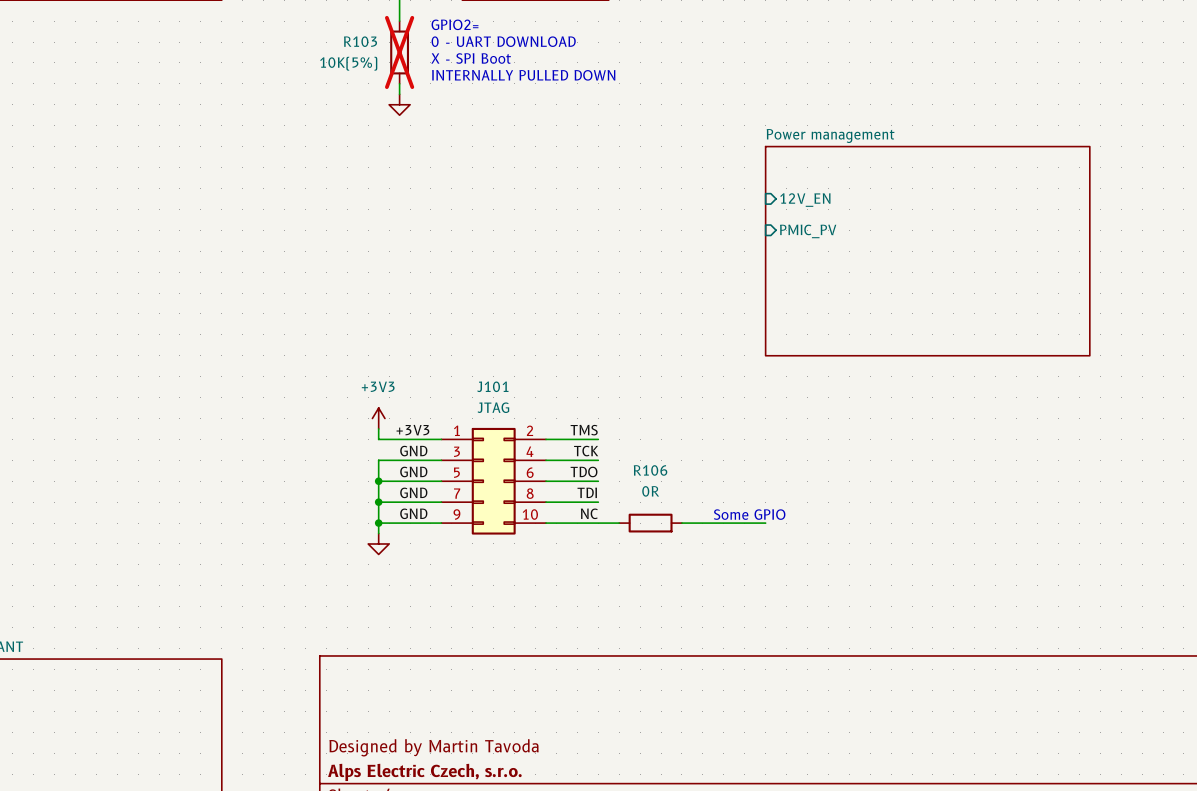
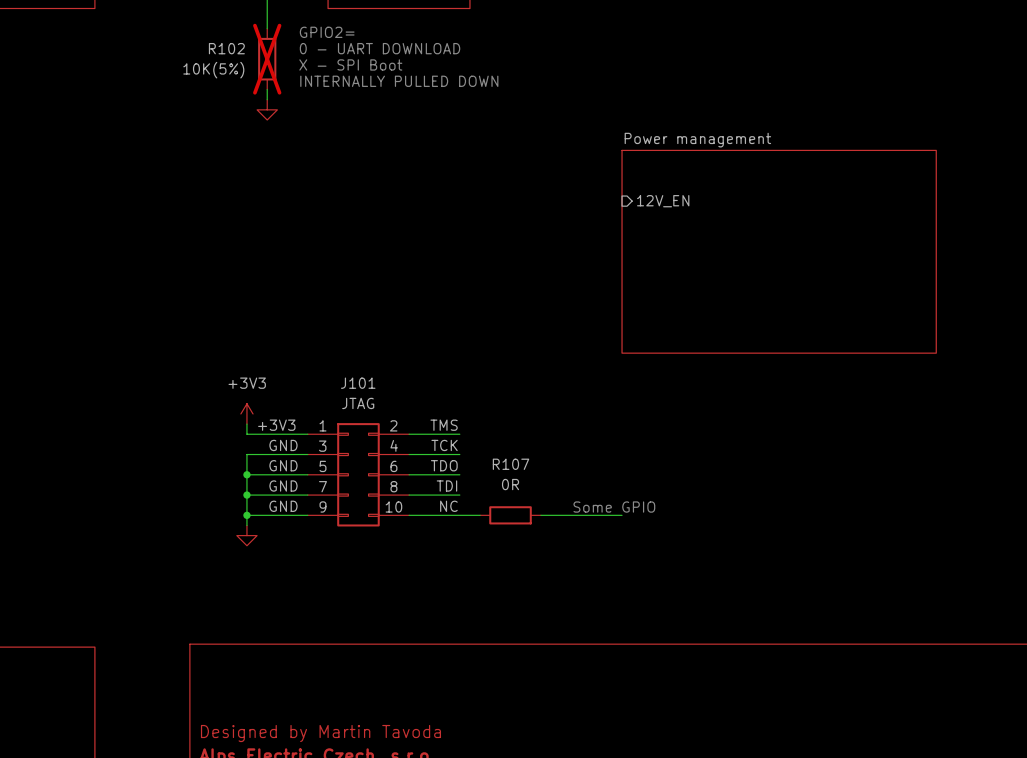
R103 name: R103 (360, 41) -> R102 (226, 48)
sheet pin: PMIC_PV (808, 231) -> none
R106 name: R106 (650, 470) -> R107 (511, 464)

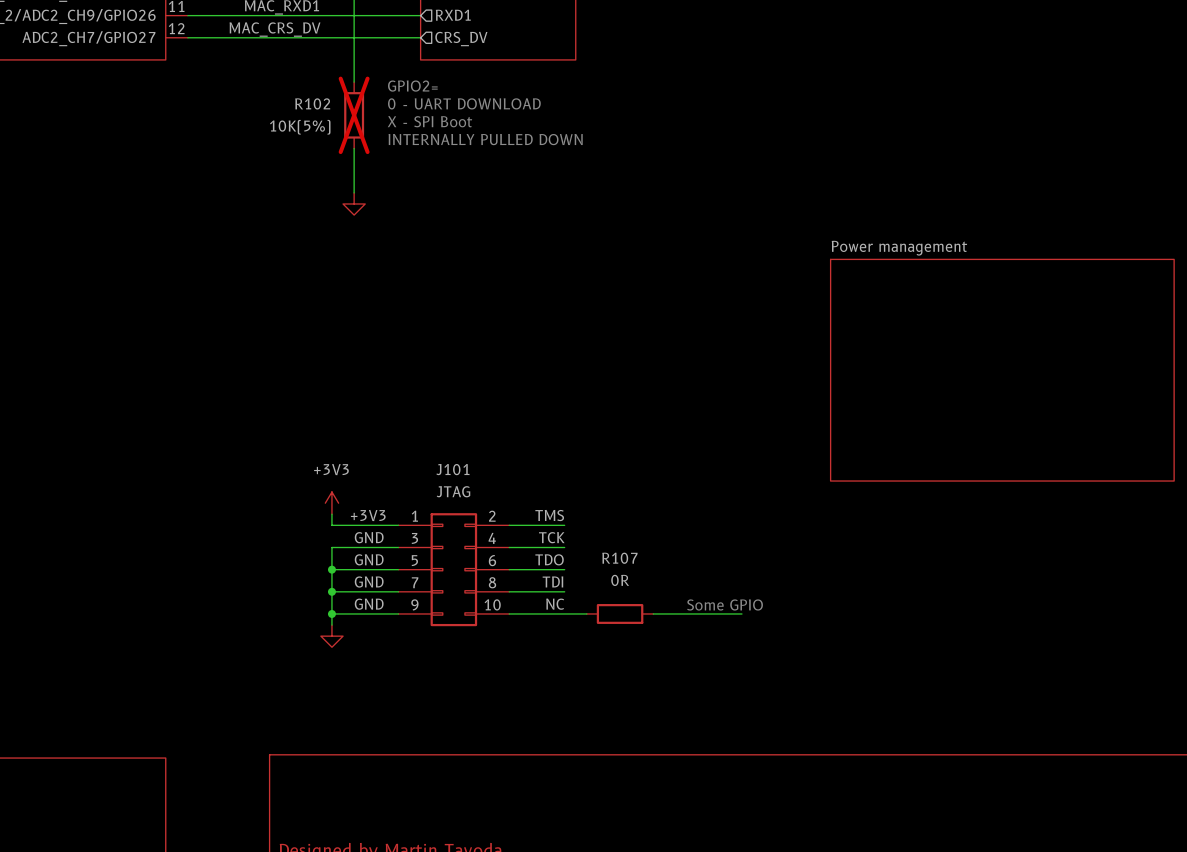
wire: none -> (354, 159) (354, 192)
power symbol position: (267, 109) -> (354, 203)
sheet pin: 12V_EN (663, 201) -> none
sheet Power management position: (779, 251) -> (1002, 370)

